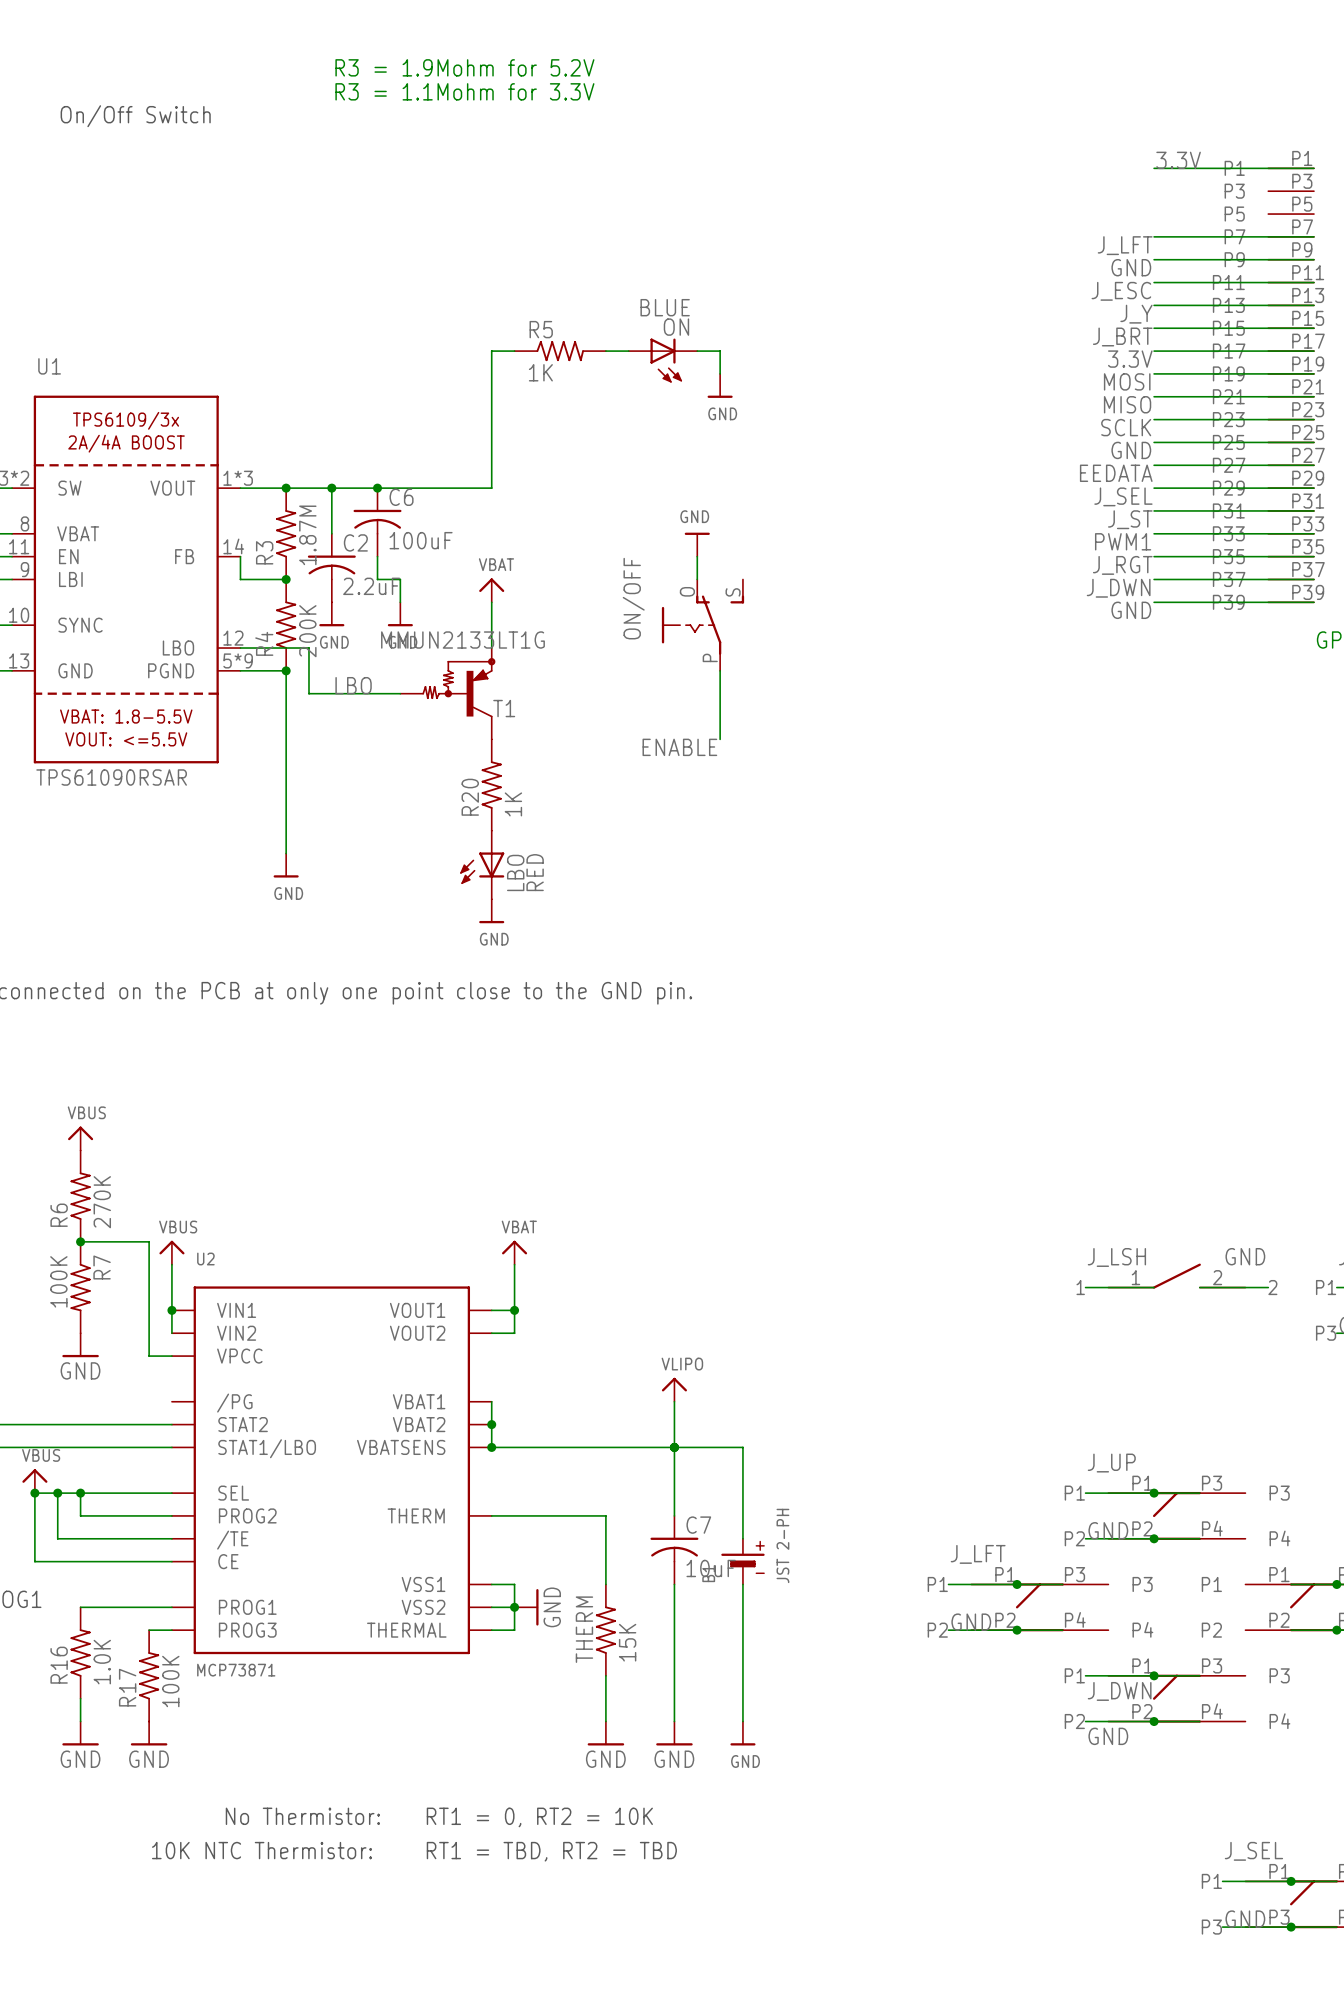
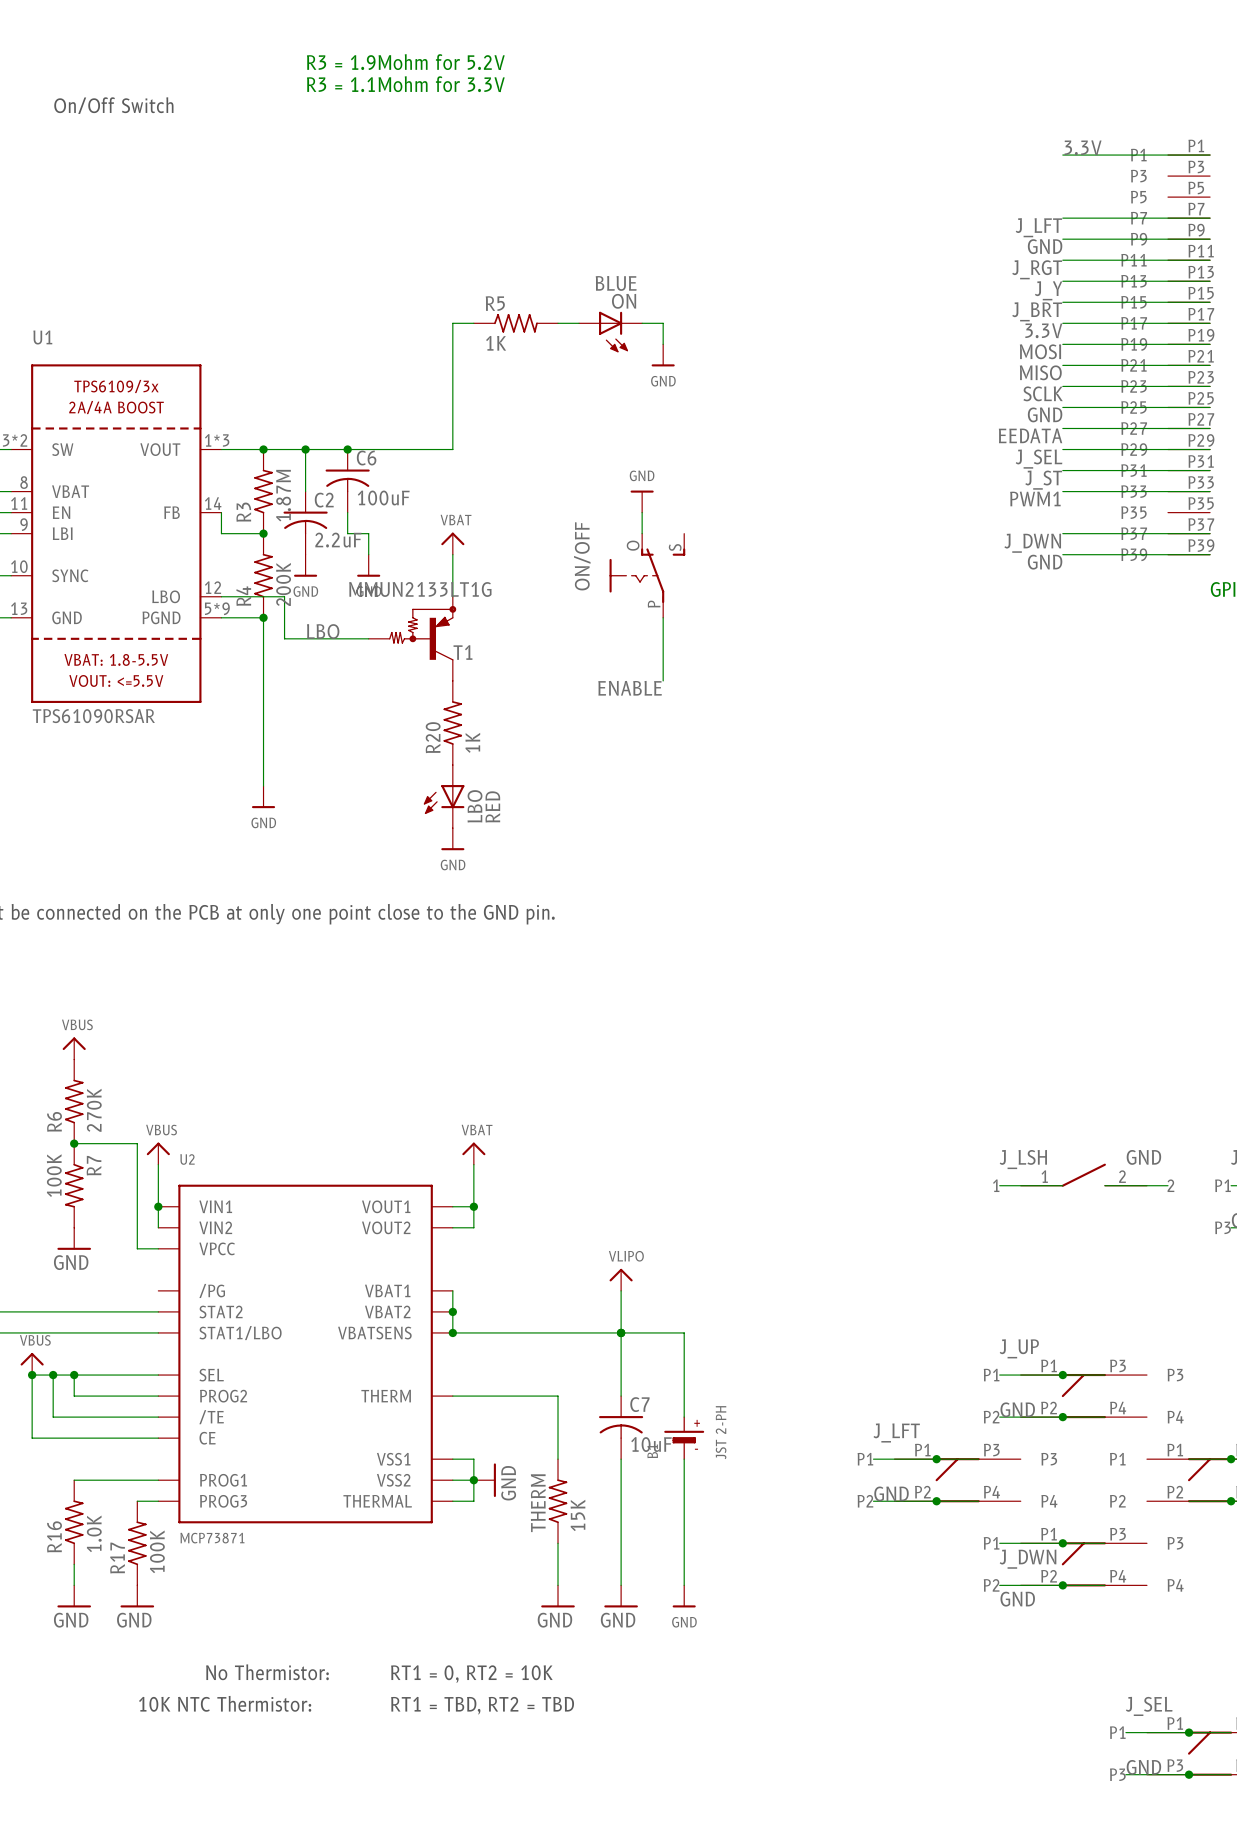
label: J_ESC (1121, 291) -> J_RGT (1037, 269)
wire: (1154, 556) (1313, 556) -> none
label: J_RGT (1122, 565) -> none

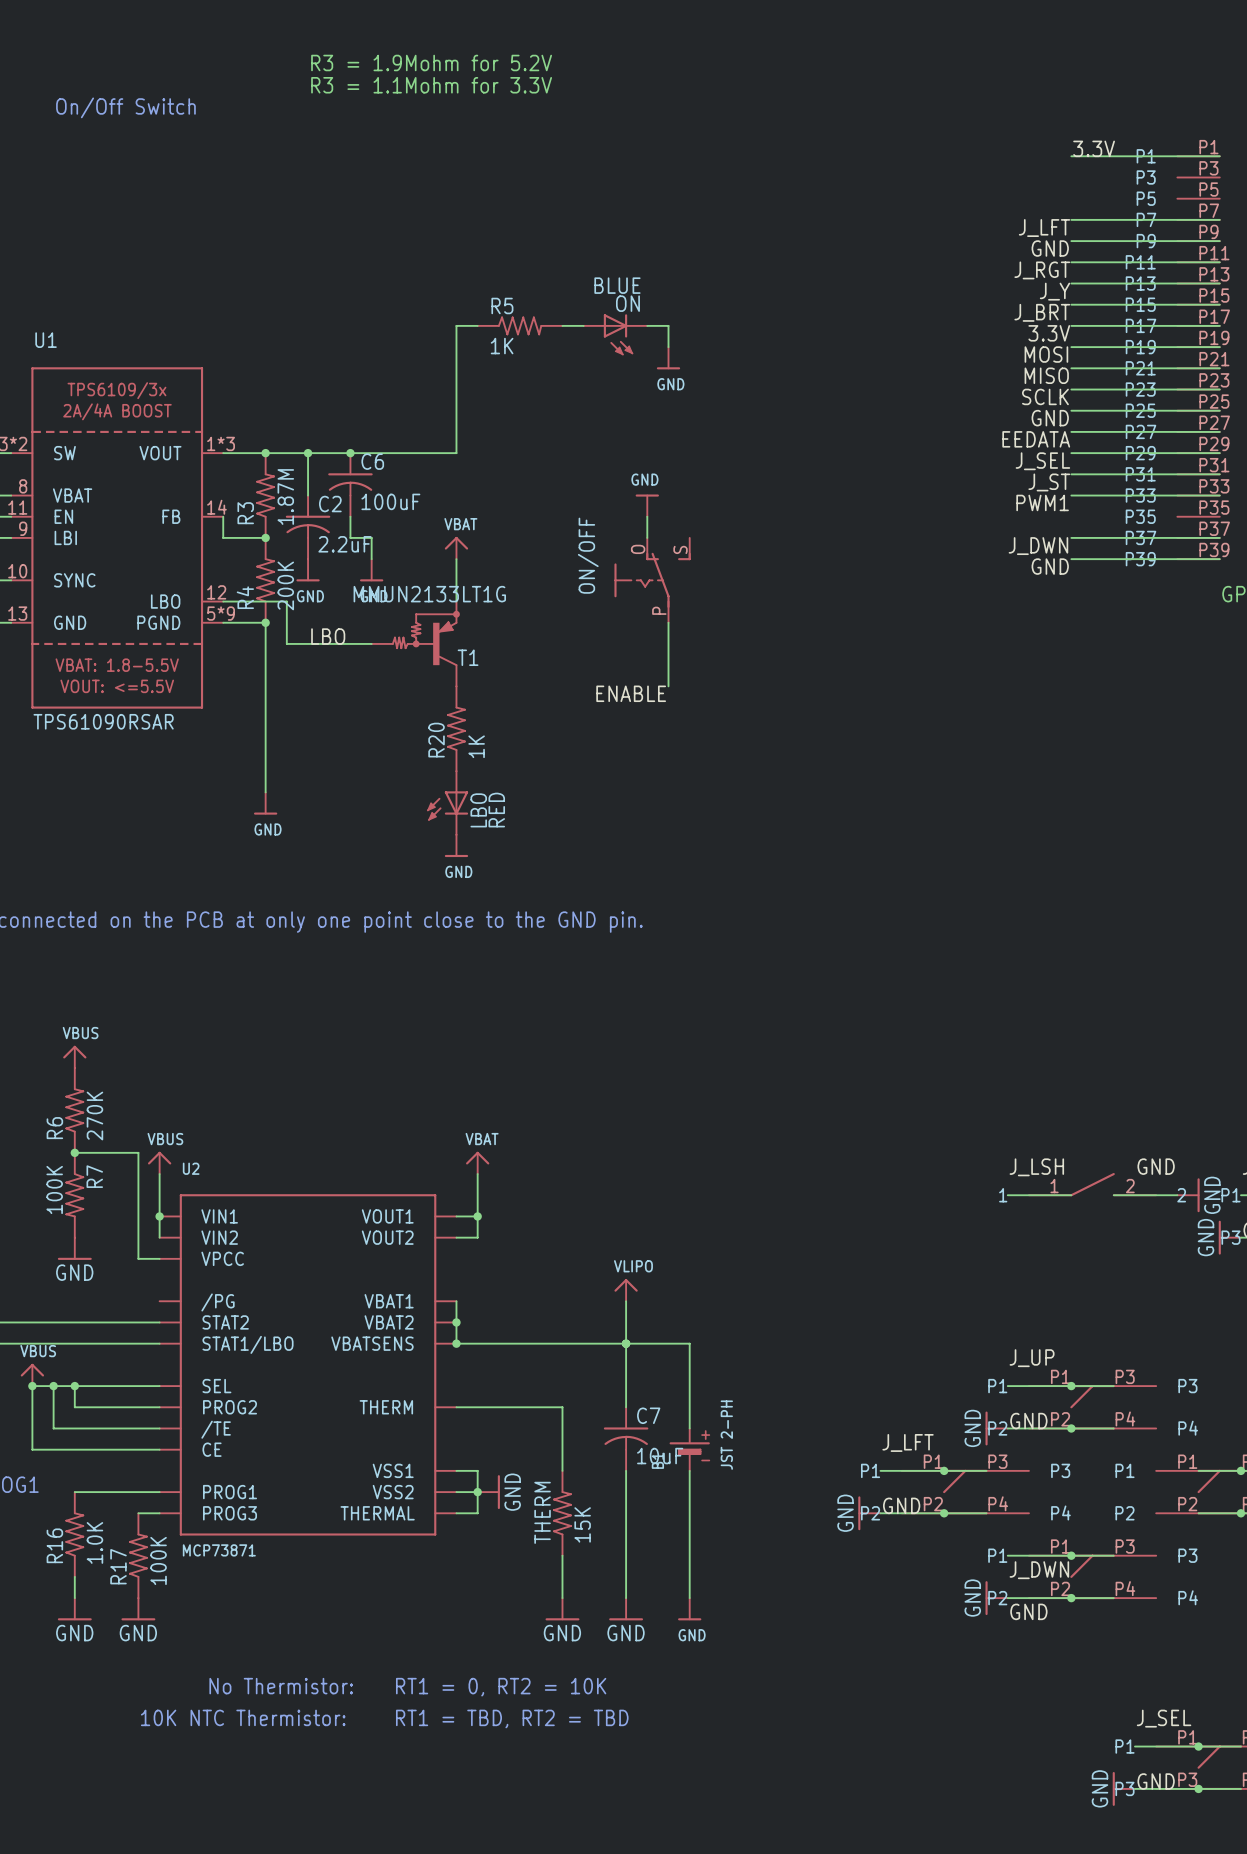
power symbol: none -> GND (1188, 1195)
power symbol: none -> GND (1229, 1237)
power symbol: none -> GND (996, 1428)
power symbol: none -> GND (869, 1513)
power symbol: none -> GND (996, 1598)
power symbol: none -> GND (1123, 1788)

